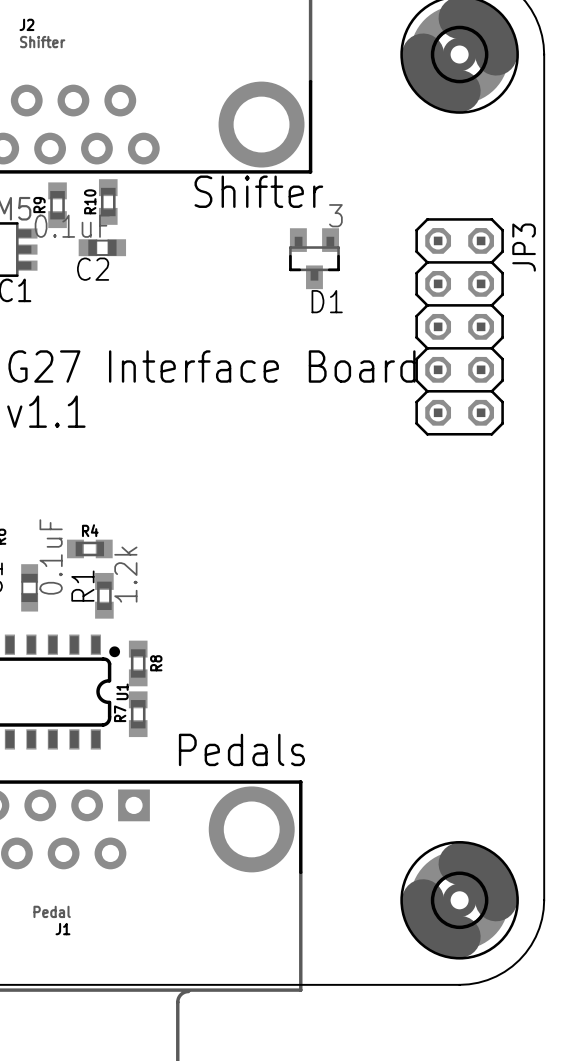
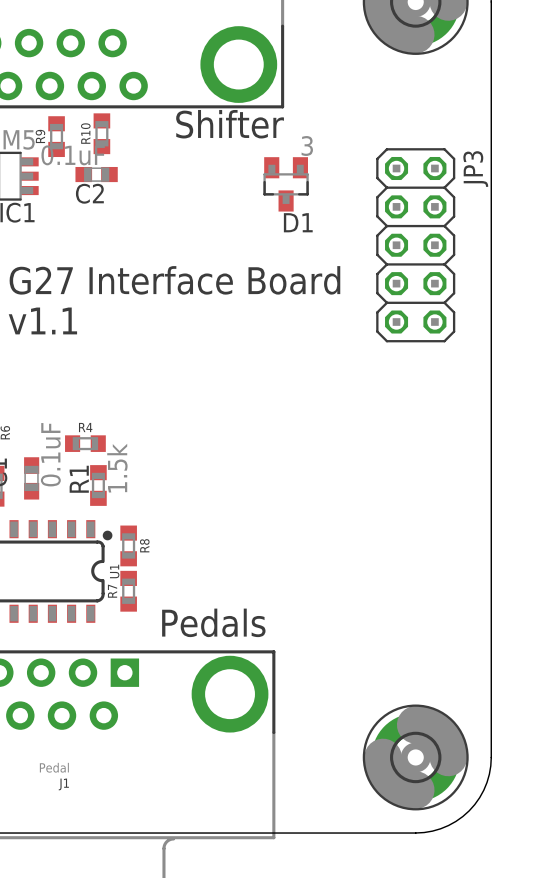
R1 value: 1.2k (125, 574) -> 1.5k (117, 468)

